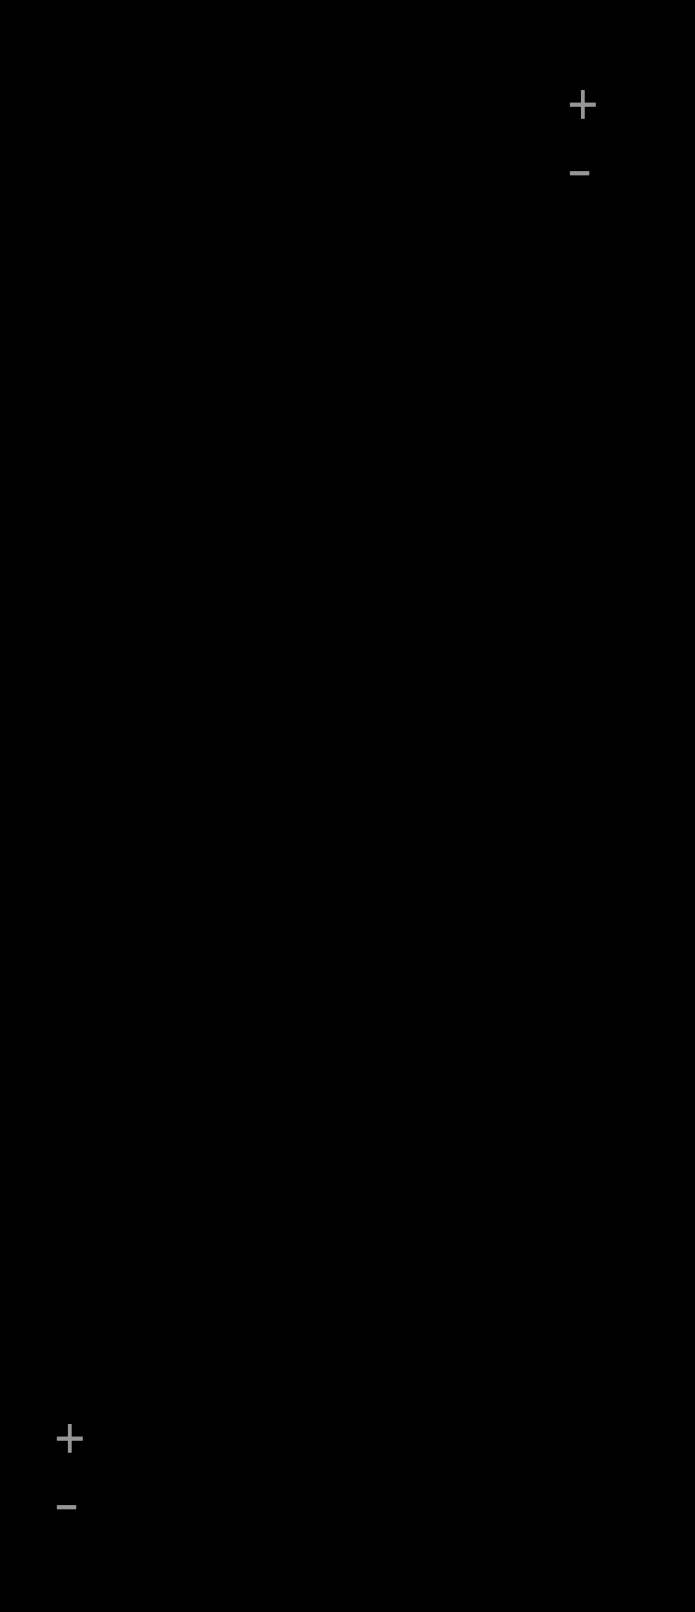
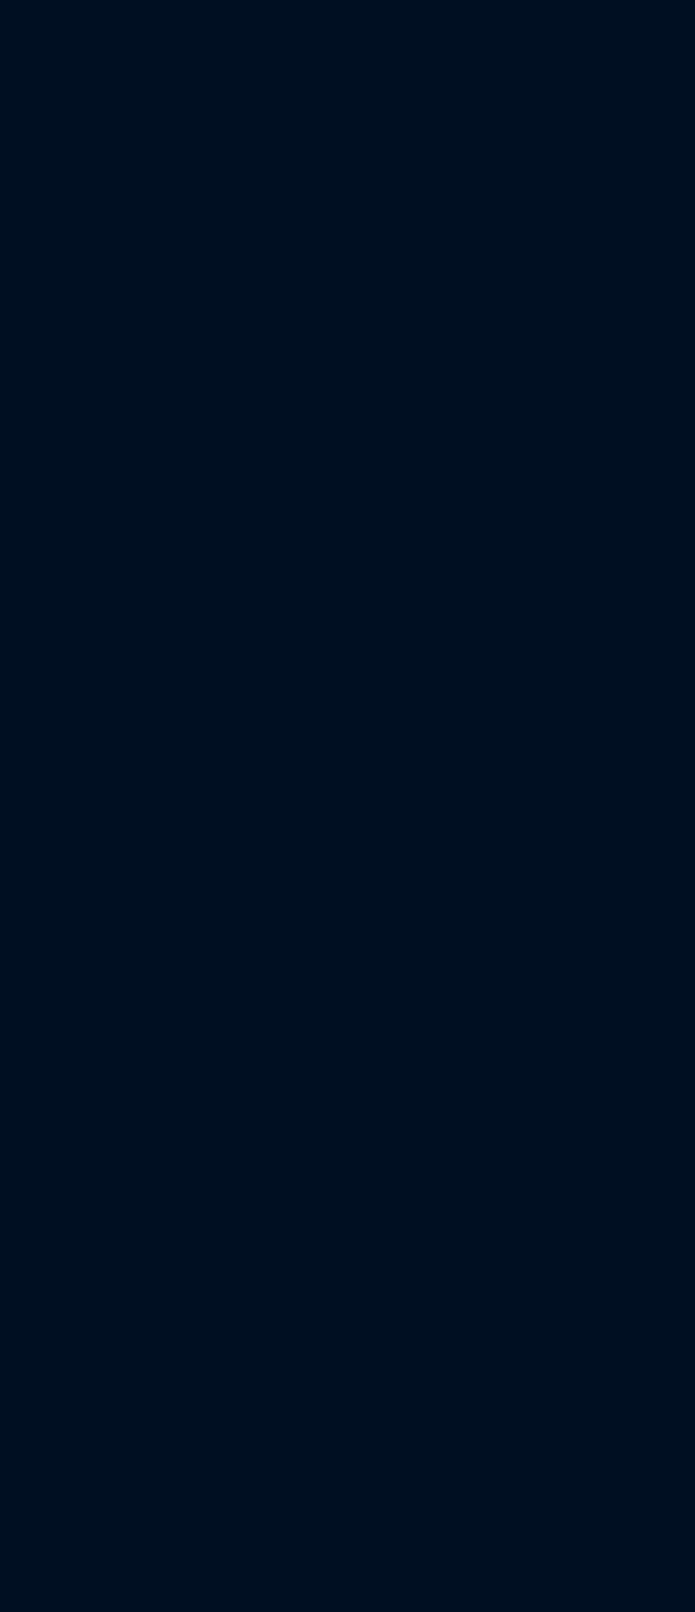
text: + (582, 104) -> none
text: - (579, 173) -> none
text: + (69, 1438) -> none
text: - (66, 1507) -> none

